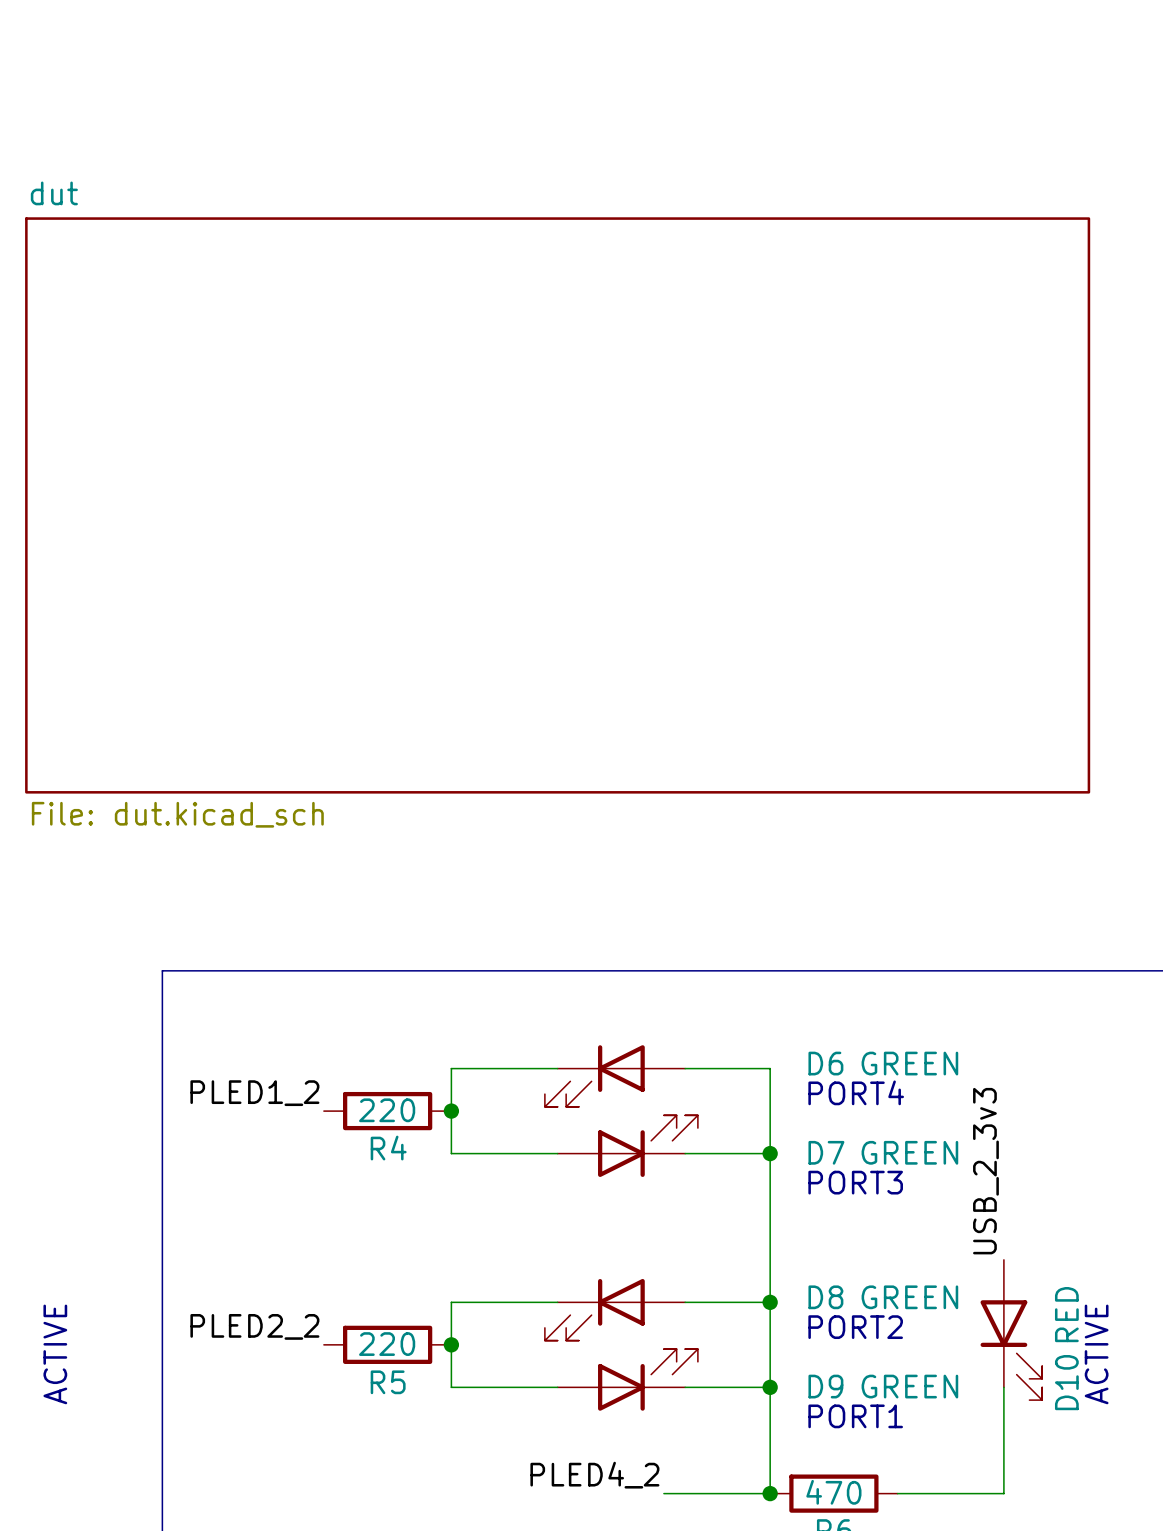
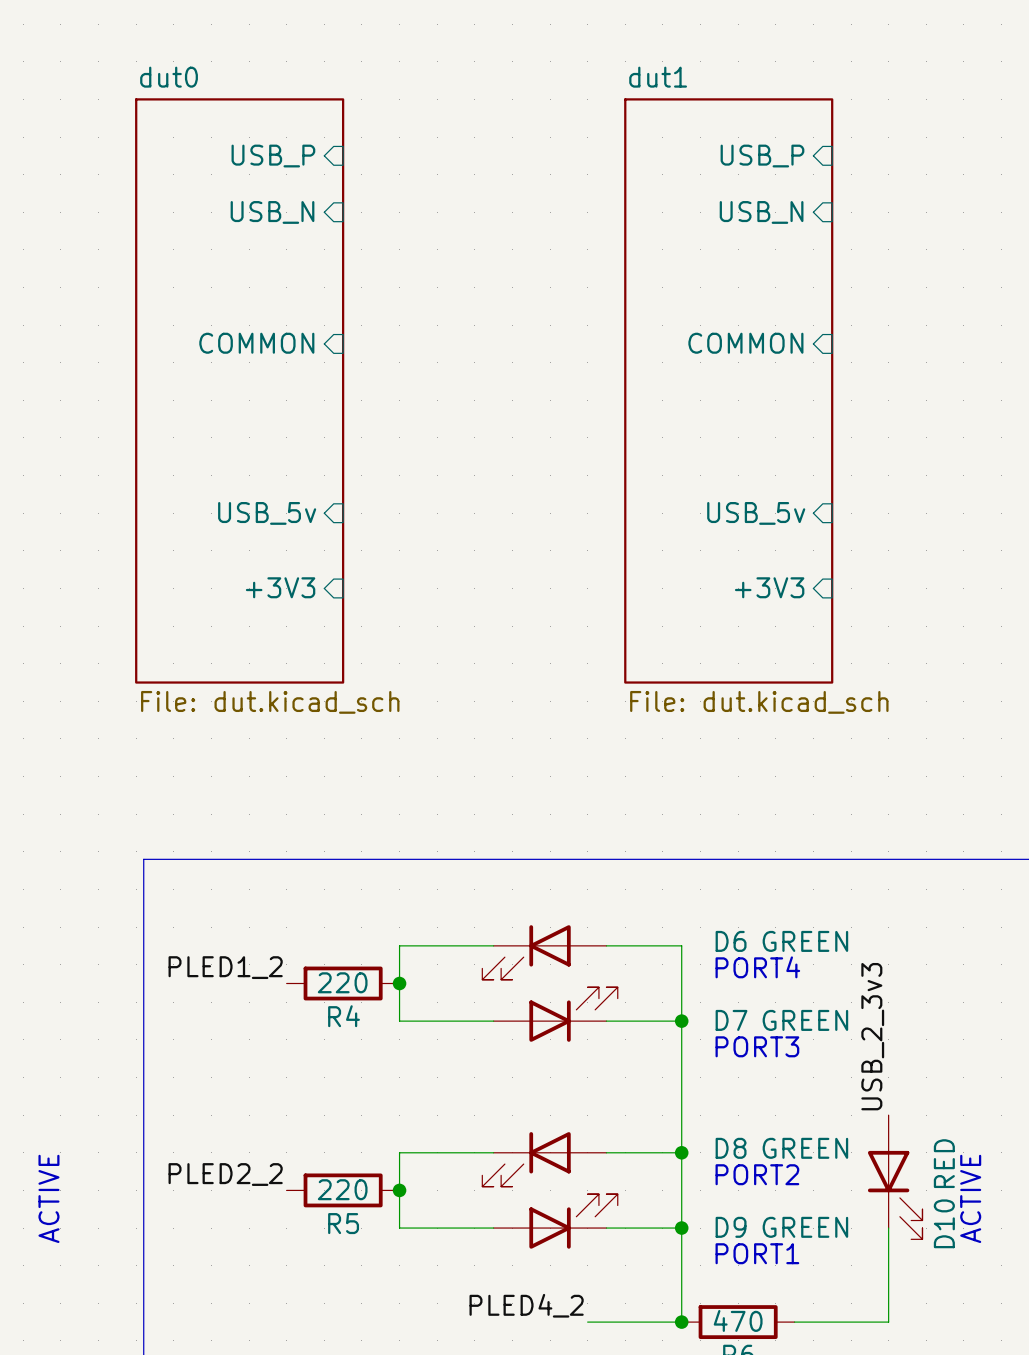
sheet pin: none -> USB_P (273, 156)
sheet pin: none -> USB_P (762, 156)
sheet pin: none -> USB_N (272, 212)
sheet pin: none -> USB_N (761, 212)
sheet pin: none -> COMMON (256, 343)
sheet pin: none -> COMMON (745, 343)
sheet dut0: none -> File: dut.kicad_sch (239, 390)
sheet dut1: none -> File: dut.kicad_sch (728, 390)
sheet dut: File: dut.kicad_sch (557, 505) -> none
sheet pin: none -> USB_5v (267, 513)
sheet pin: none -> USB_5v (756, 513)
sheet pin: none -> +3V3 (280, 587)
sheet pin: none -> +3V3 (769, 587)

